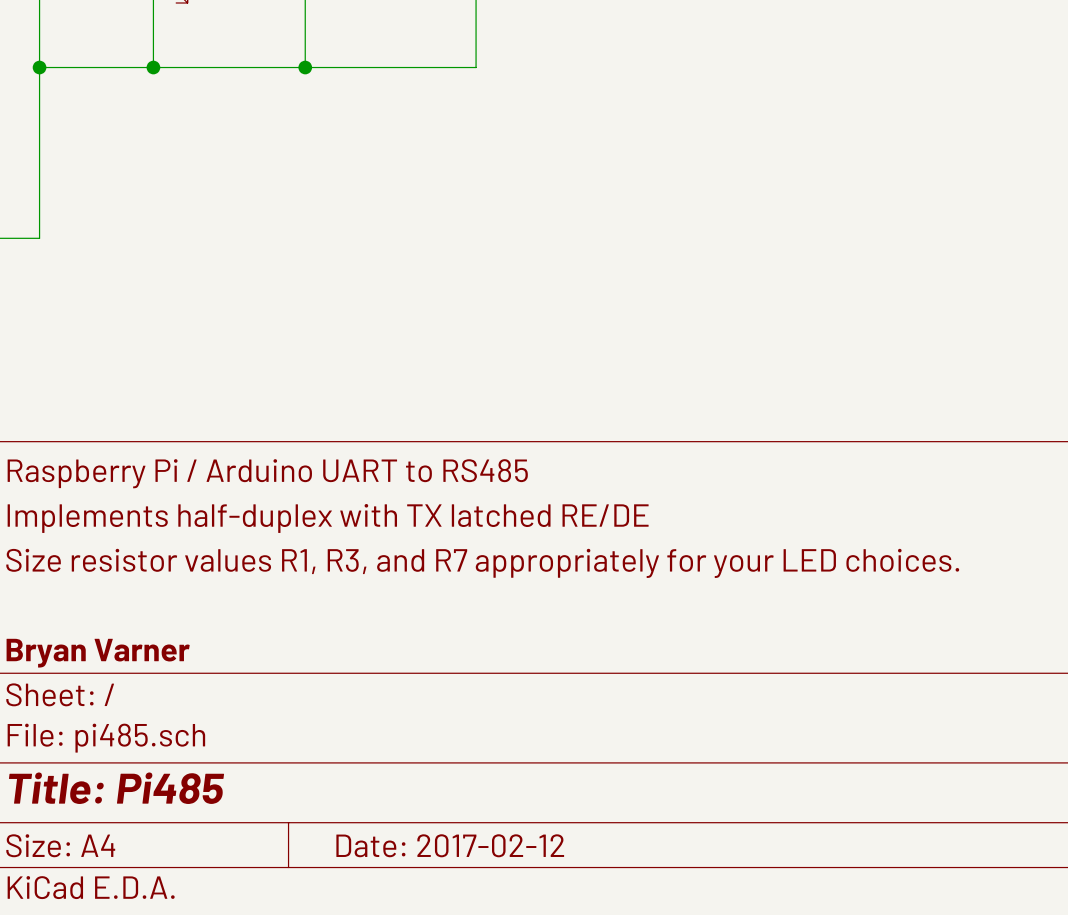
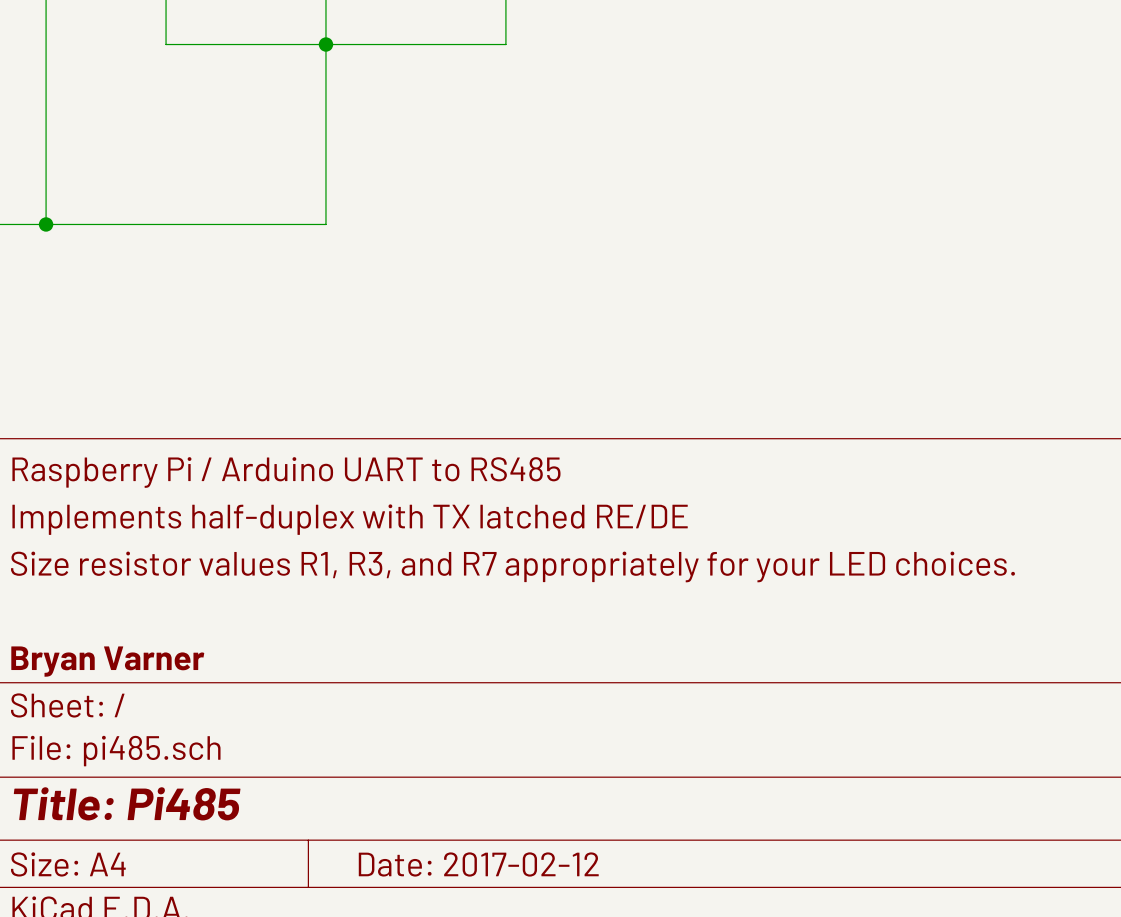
wire: (39, 67) (153, 67) -> none
junction: (39, 67) -> none
junction: (153, 67) -> none
wire: none -> (325, 44) (325, 224) (46, 224)
junction: none -> (46, 224)

